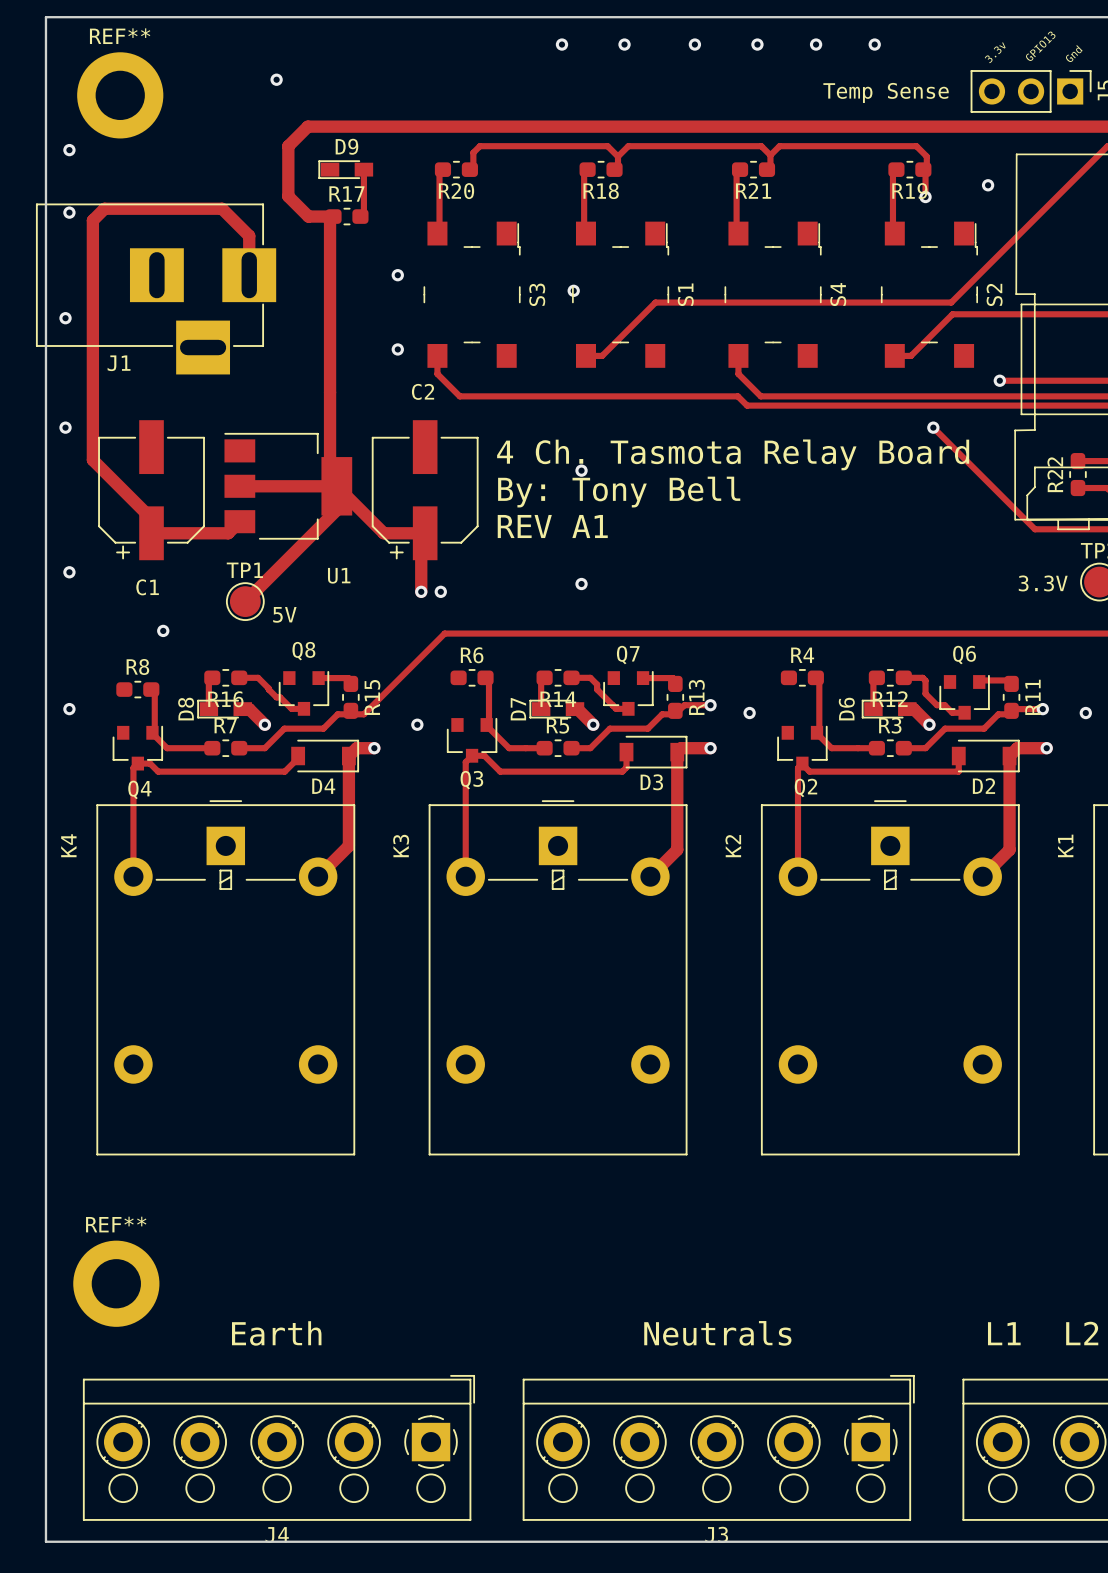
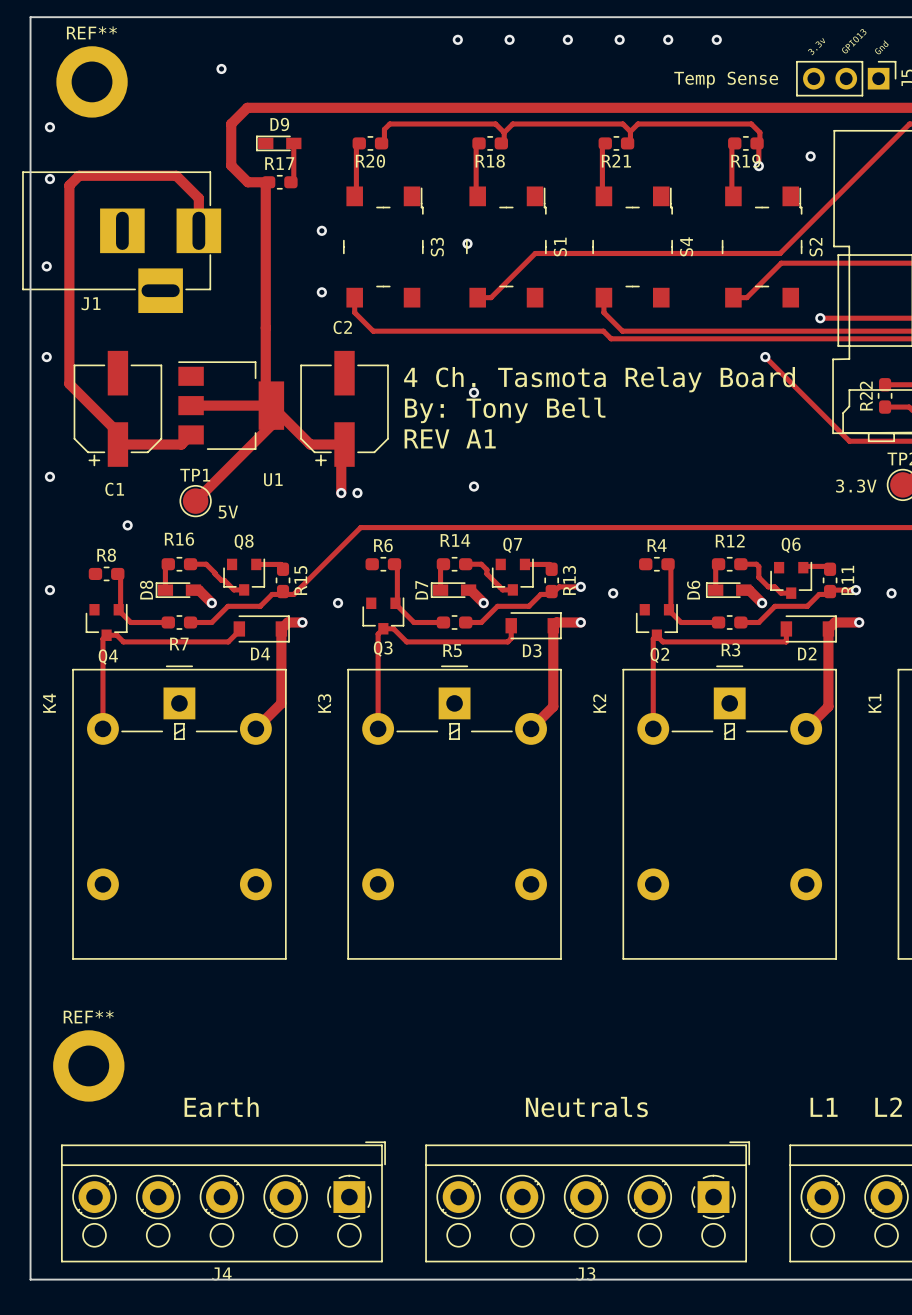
R16 name position: R16 (225, 699) -> R16 (179, 539)
R14 name position: R14 (558, 699) -> R14 (455, 540)
R12 name position: R12 (890, 699) -> R12 (730, 540)
R7 name position: R7 (225, 725) -> R7 (179, 644)
R5 name position: R5 (557, 725) -> R5 (452, 650)
R3 name position: R3 (890, 725) -> R3 (730, 649)

